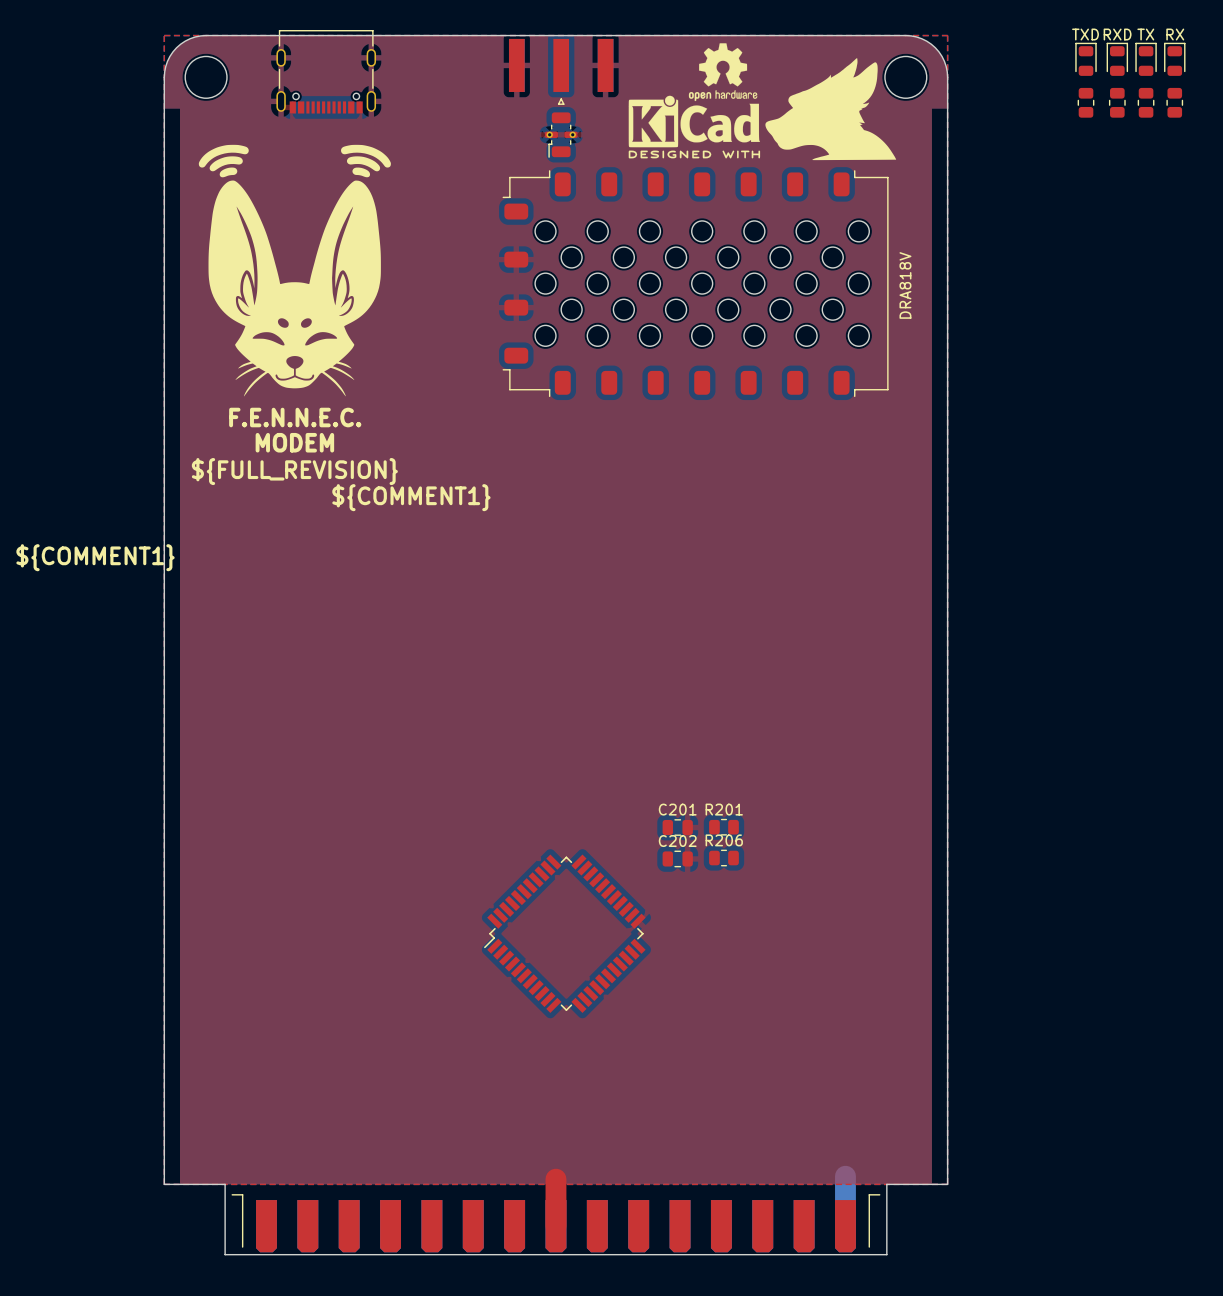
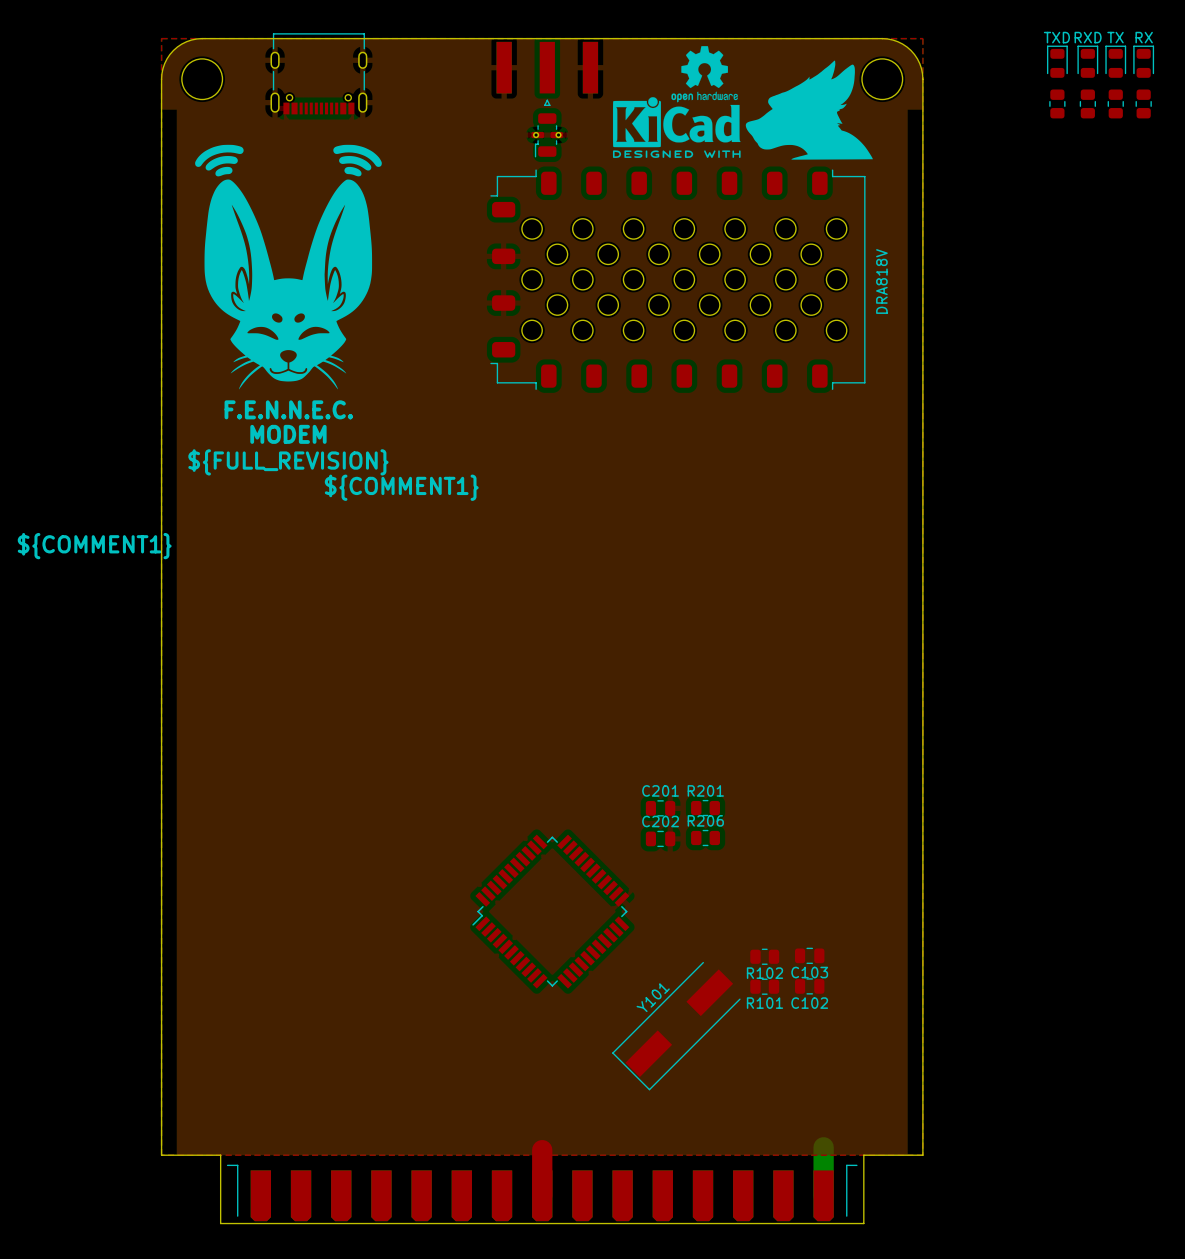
C103: none -> (809, 955)
R102: none -> (764, 956)
C102: none -> (809, 986)
R101: none -> (764, 986)
Y101: none -> (676, 1026)

